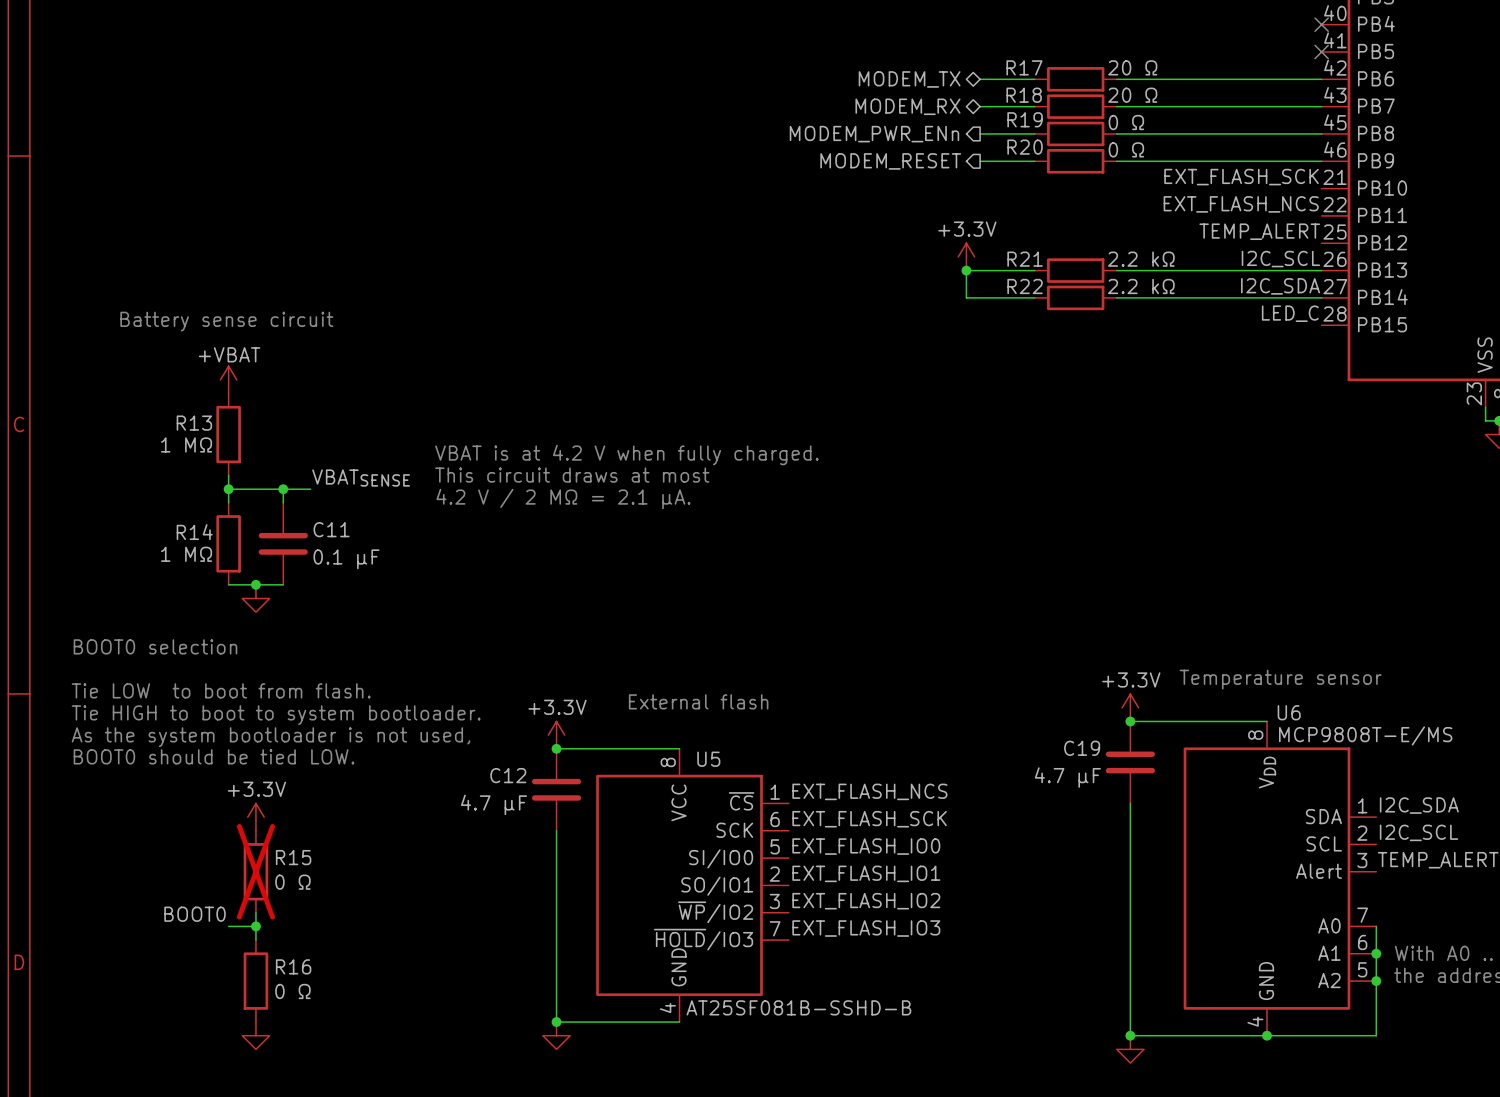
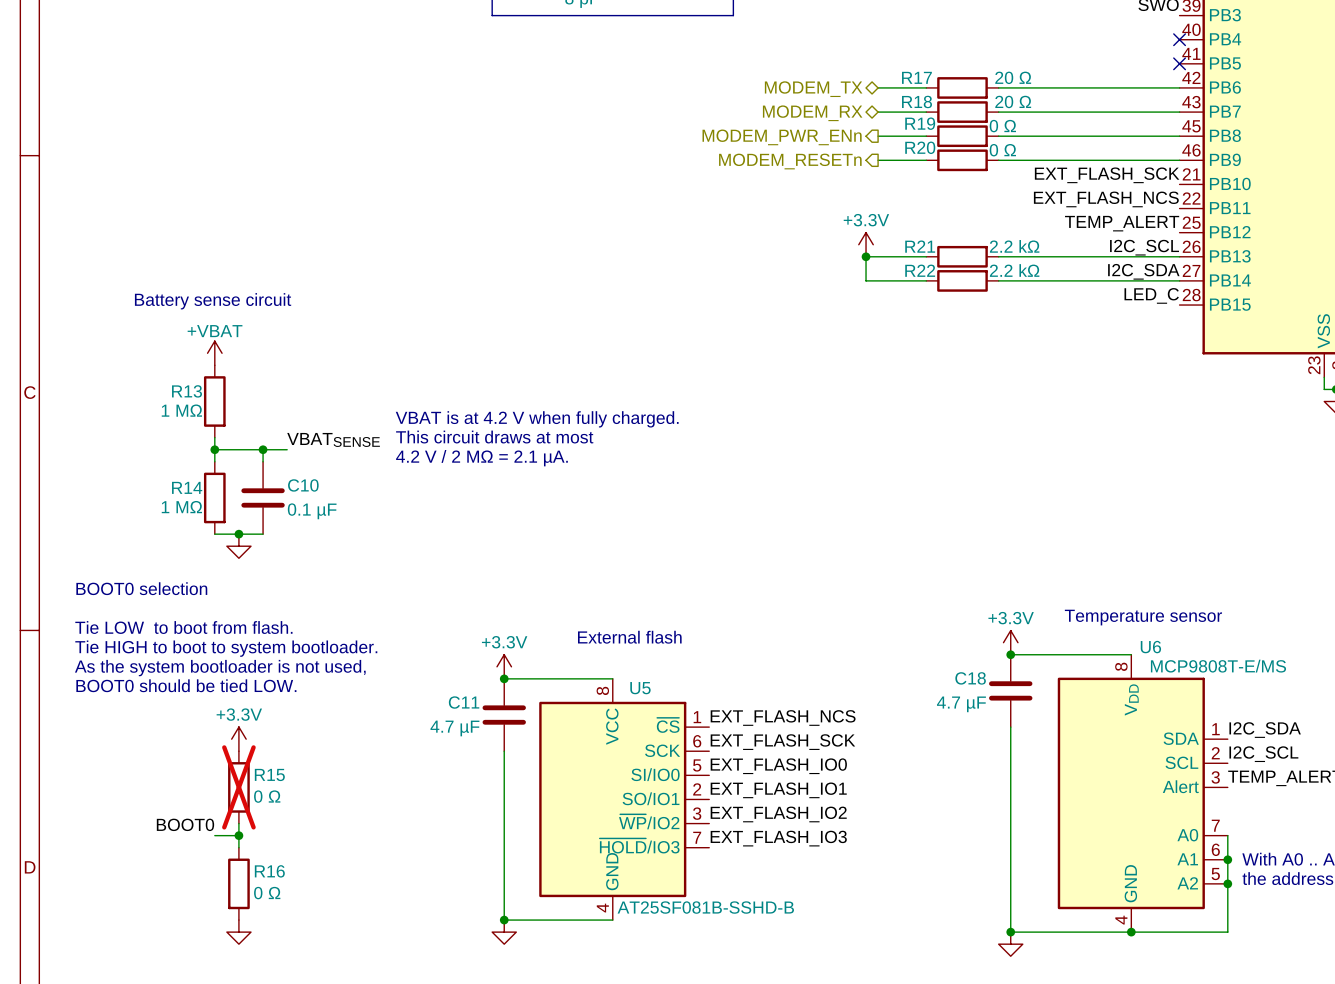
hierarchical label: MODEM_RESET (890, 161) -> MODEM_RESETn (790, 161)
C11 name: C11 (331, 529) -> C10 (303, 485)
C19 name: C19 (1082, 748) -> C18 (970, 678)
C12 name: C12 (508, 775) -> C11 (464, 702)

